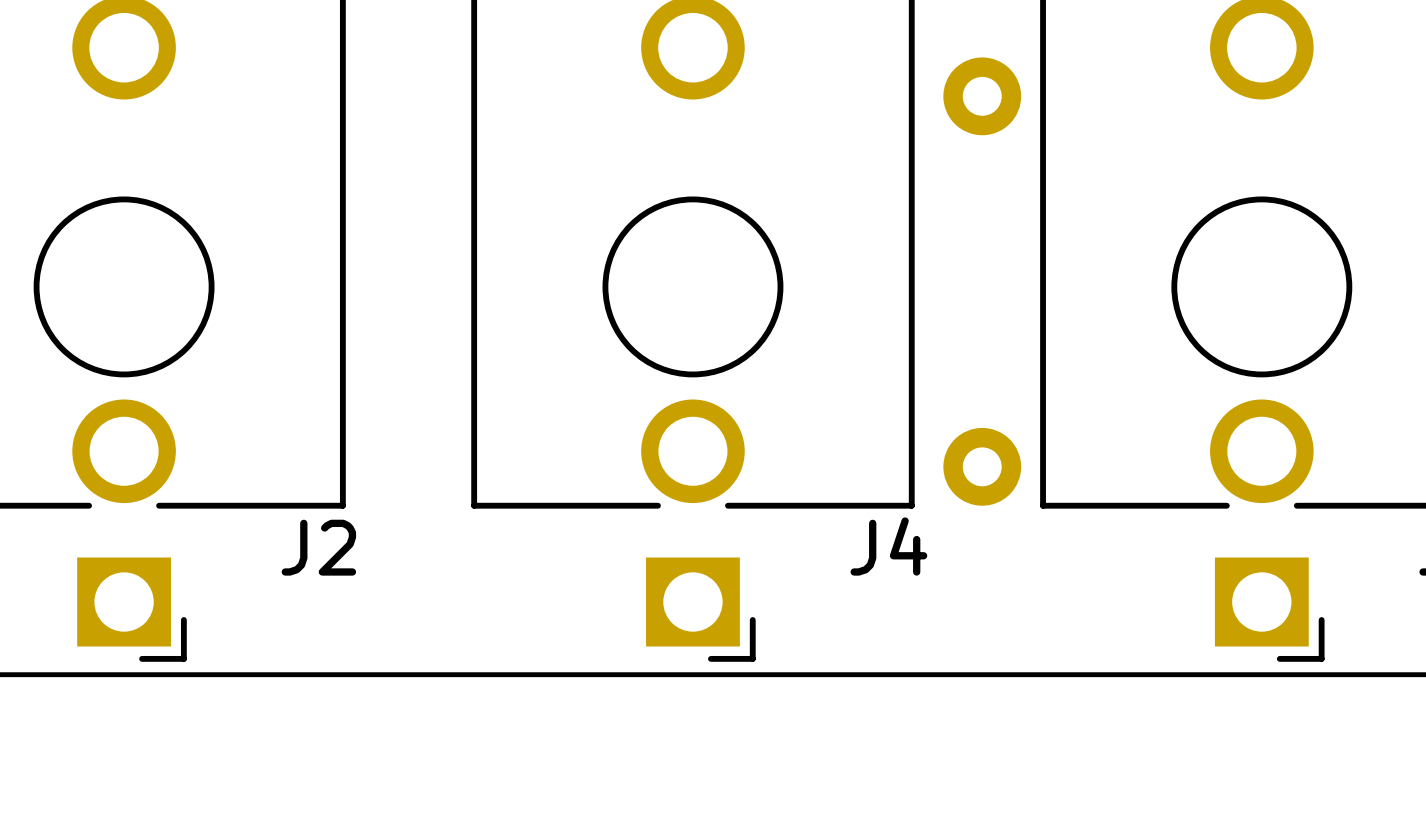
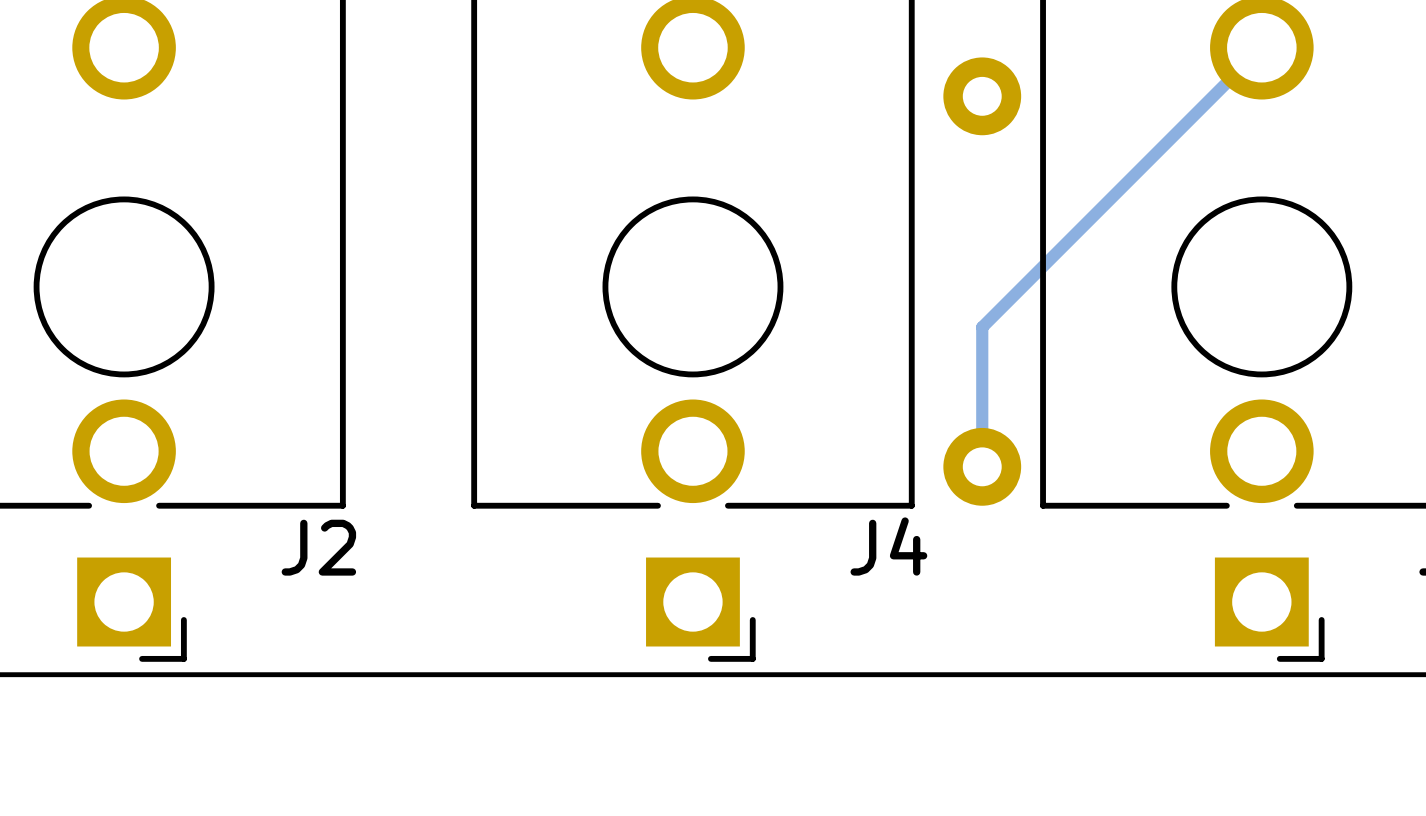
track: none -> (1261, 47) (982, 327) (982, 466)

